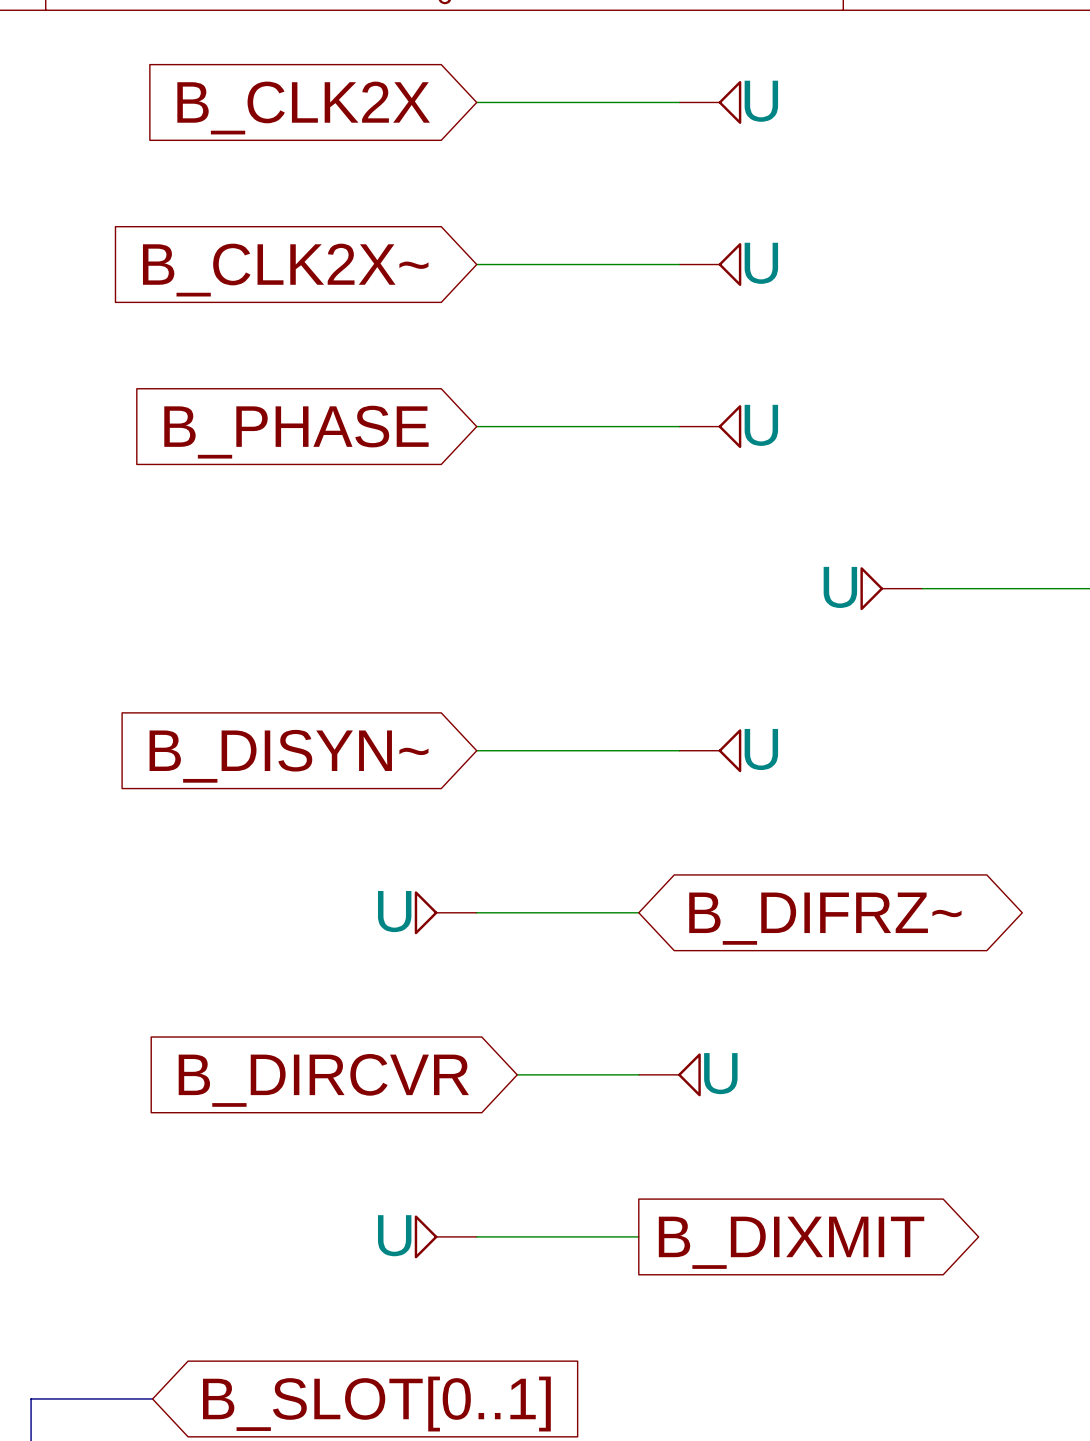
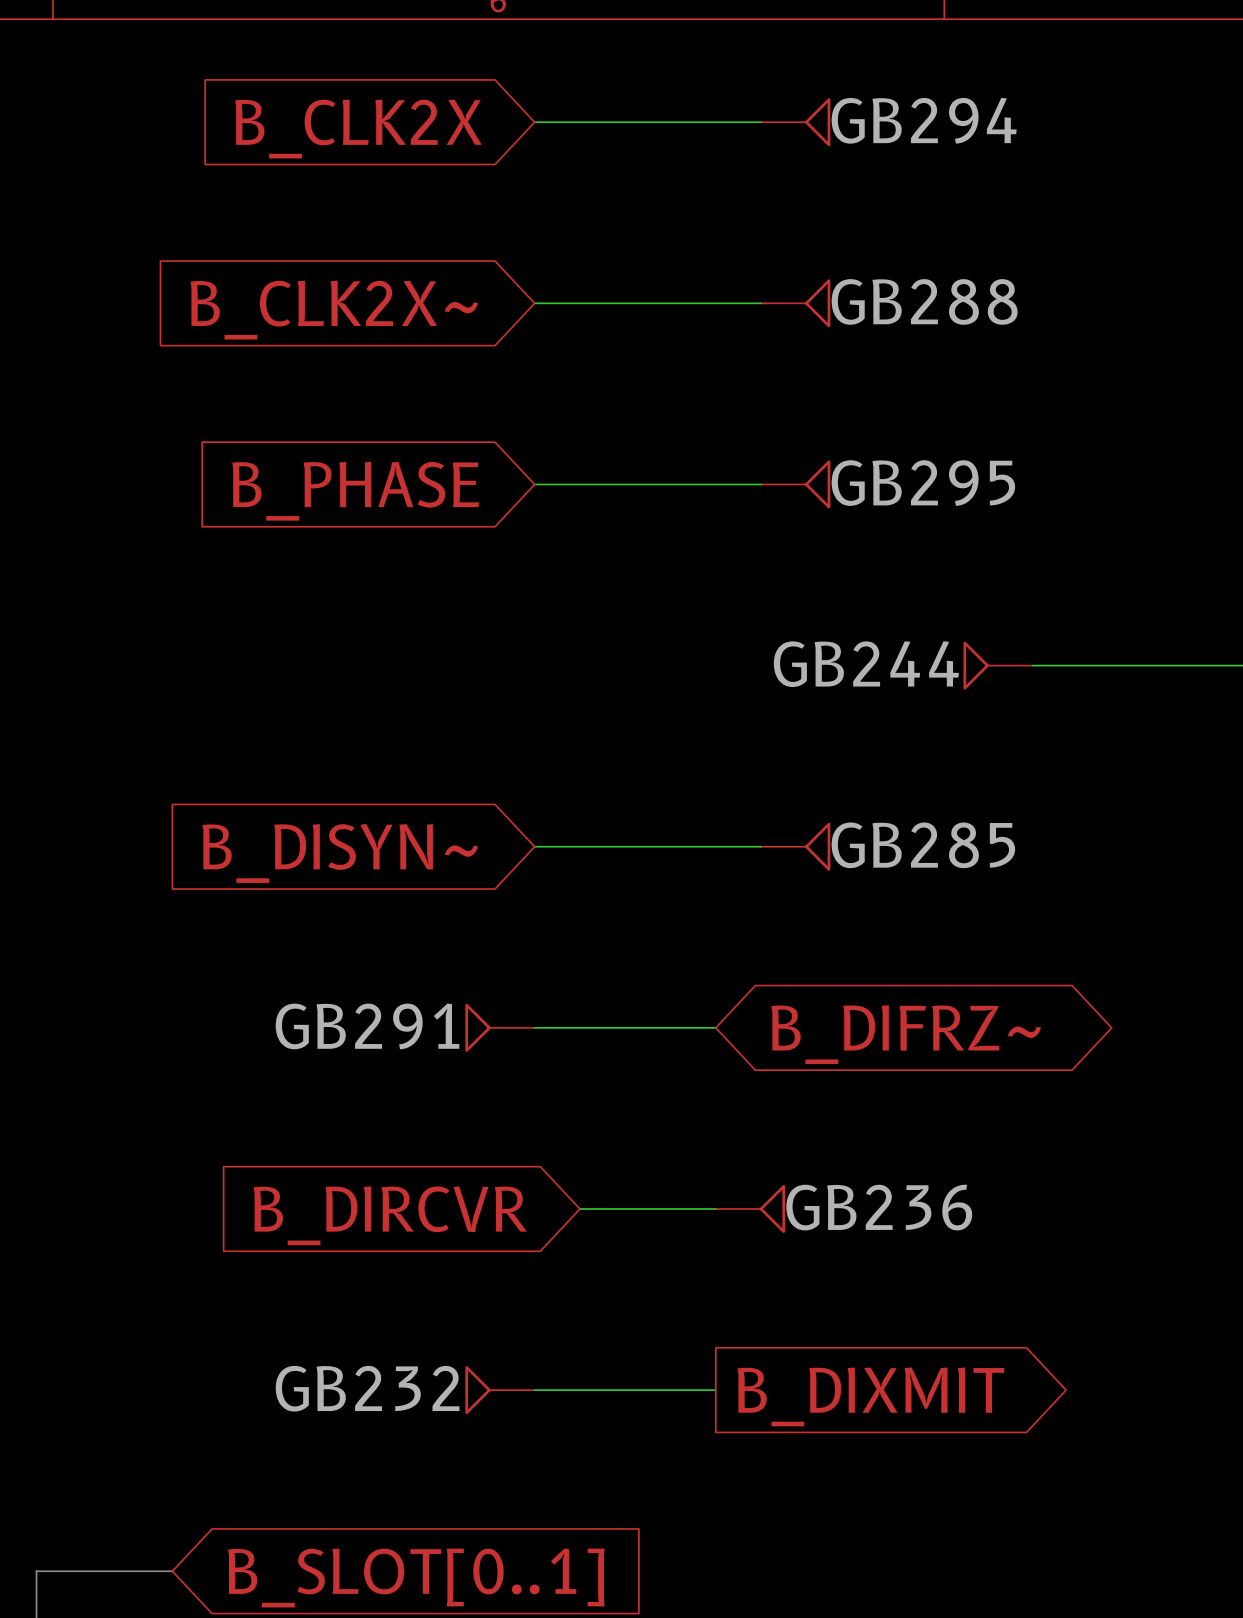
U name: U (761, 101) -> GB294 (924, 120)
U name: U (761, 263) -> GB288 (924, 301)
U name: U (761, 425) -> GB295 (923, 483)
U name: U (840, 587) -> GB244 (866, 664)
U name: U (761, 749) -> GB285 (923, 845)
U name: U (394, 911) -> GB291 (367, 1026)
U name: U (720, 1073) -> GB236 (879, 1207)
U name: U (394, 1235) -> GB232 (367, 1388)

